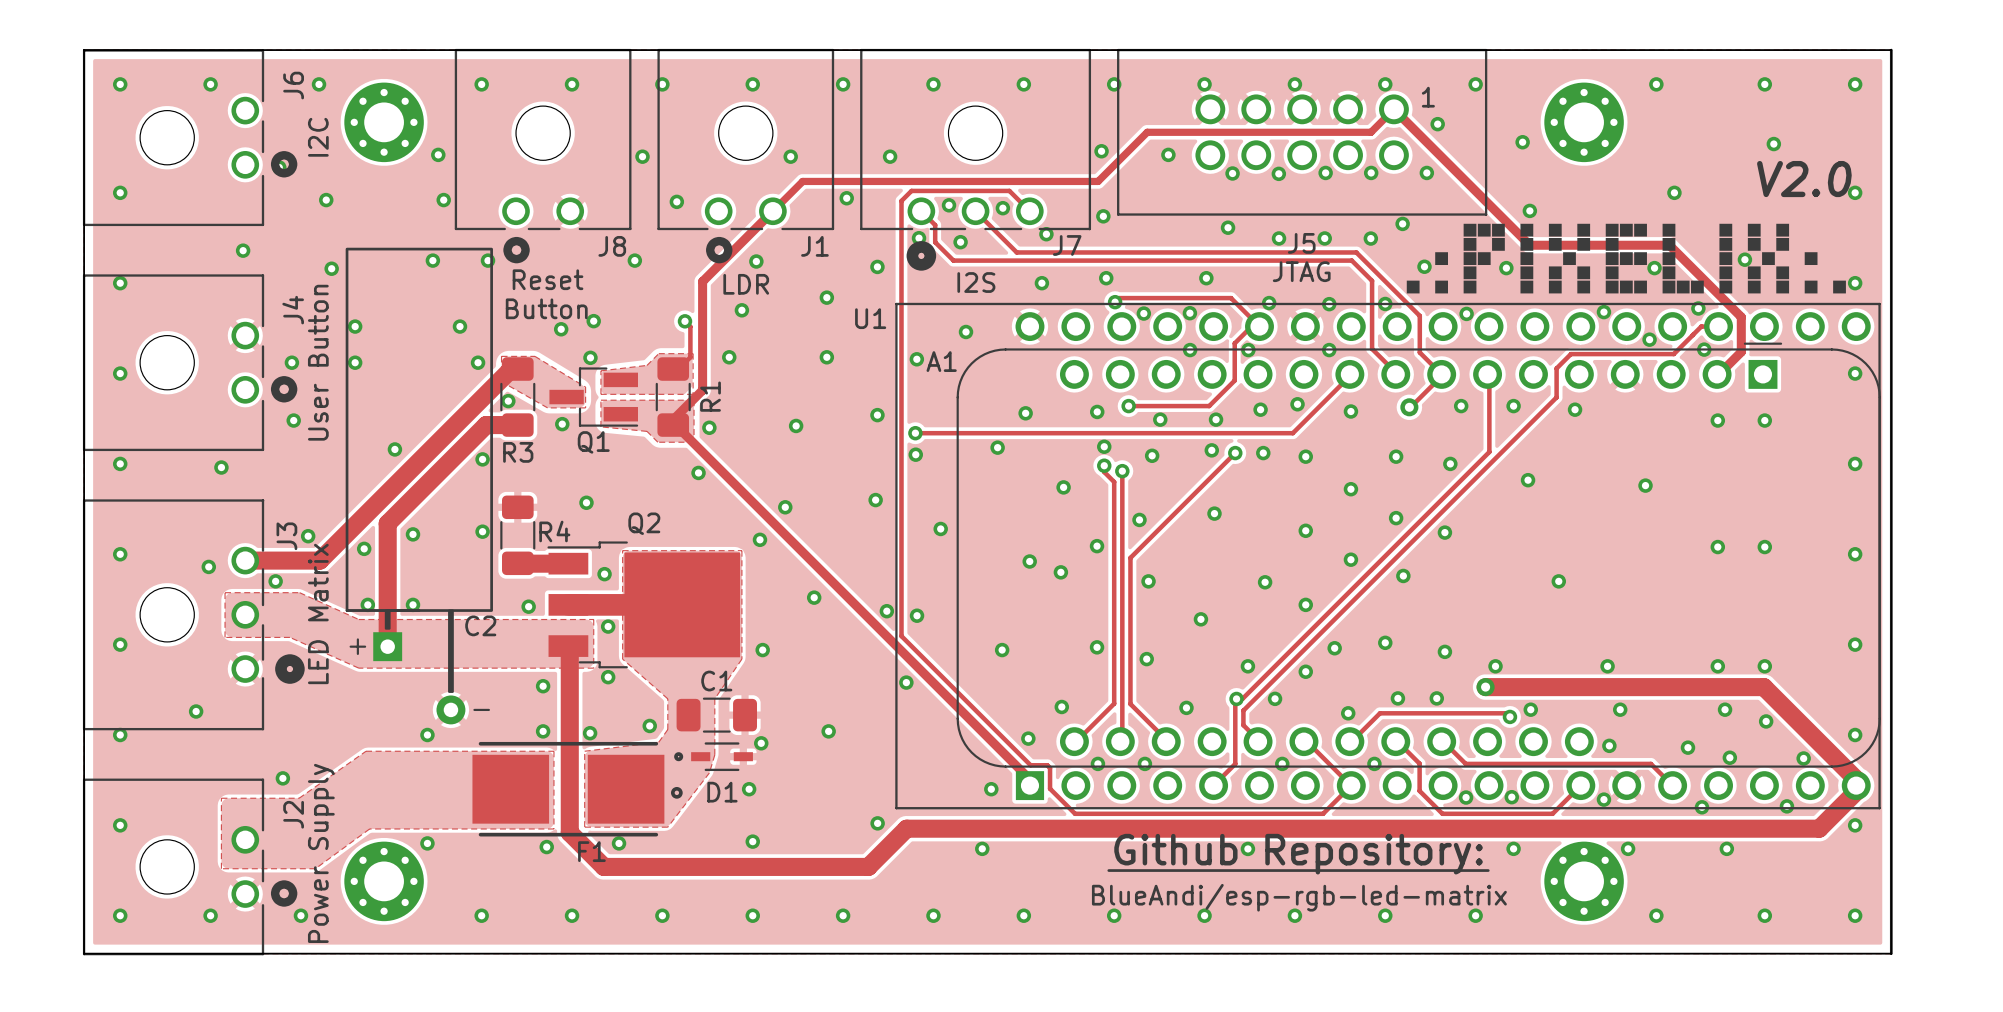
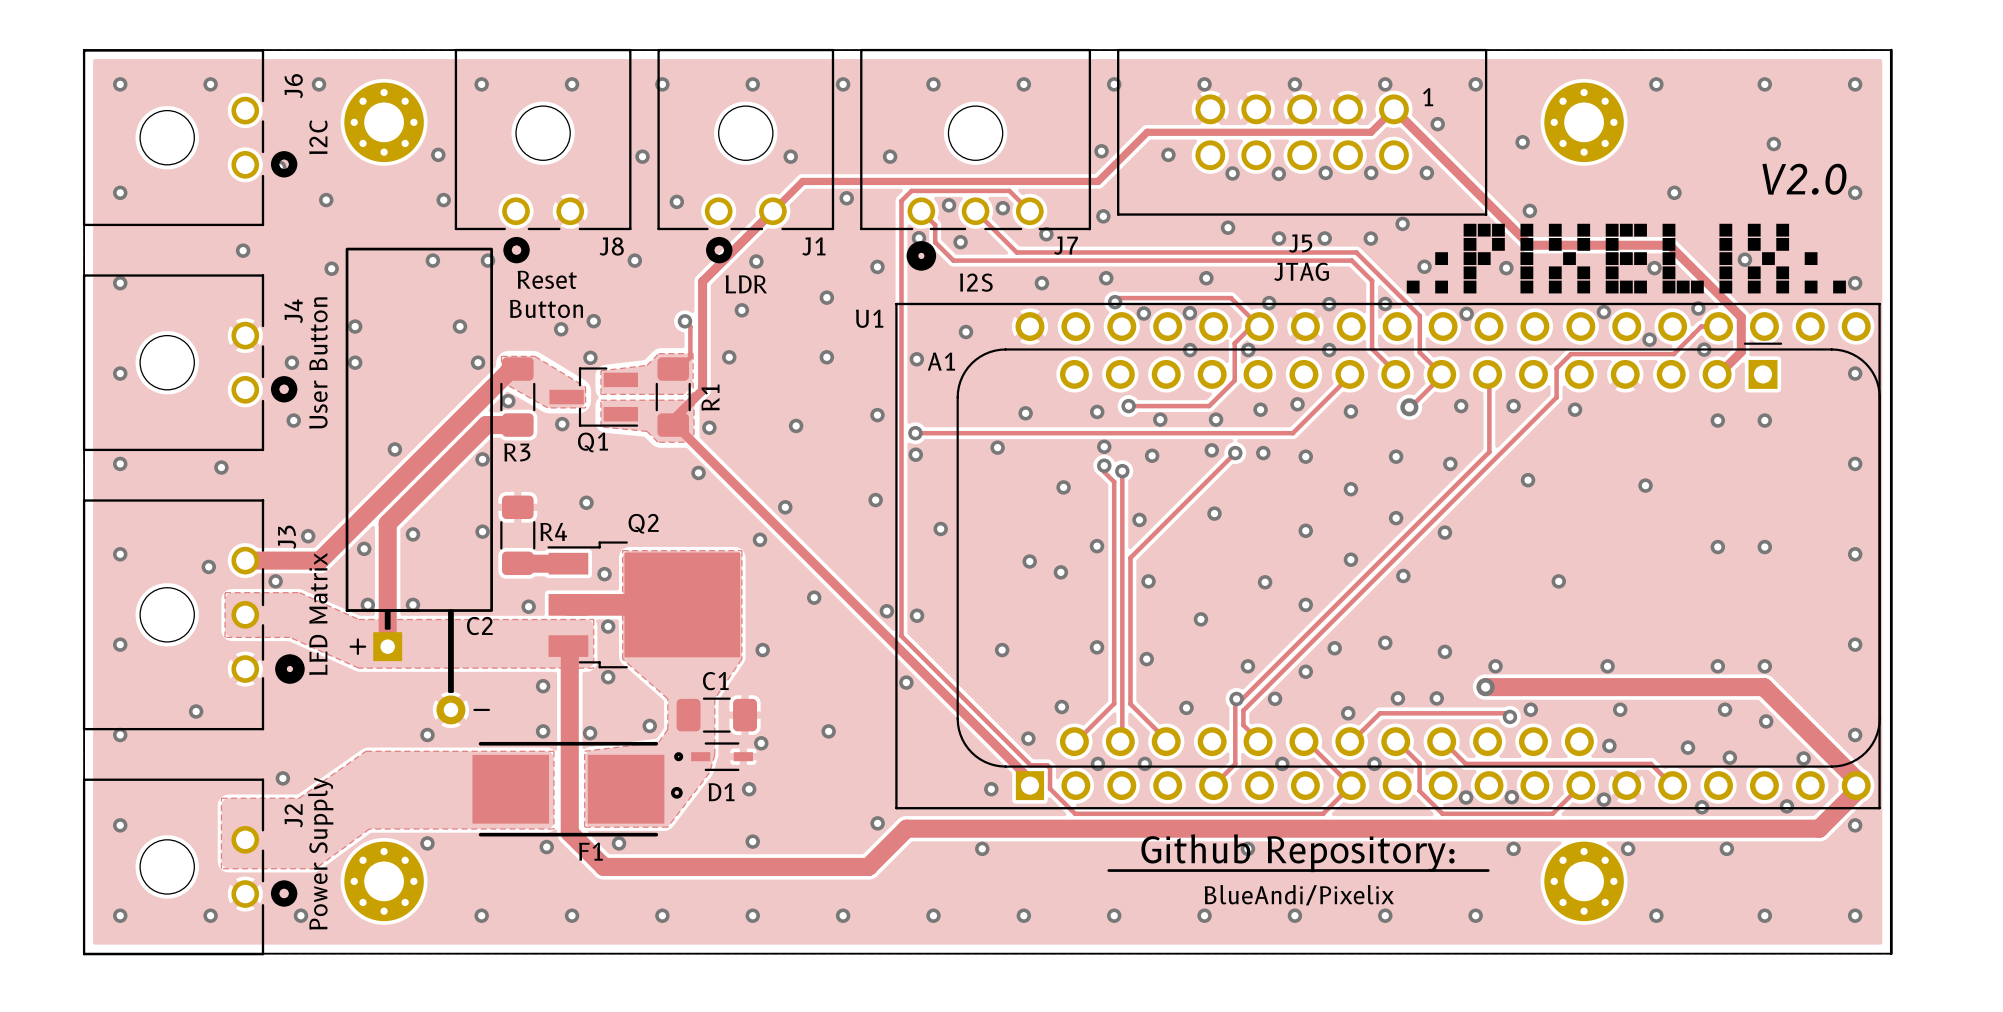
text: BlueAndi/esp-rgb-led-matrix (1299, 897) -> BlueAndi/Pixelix (1299, 895)

